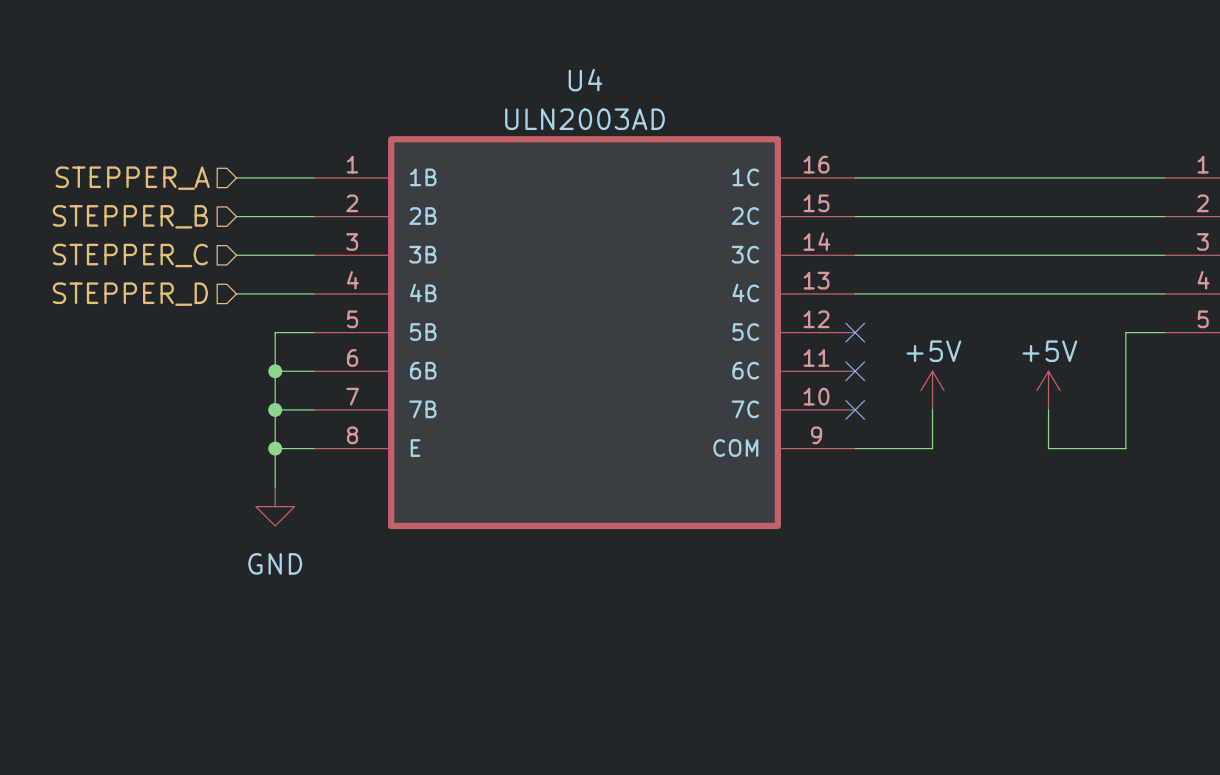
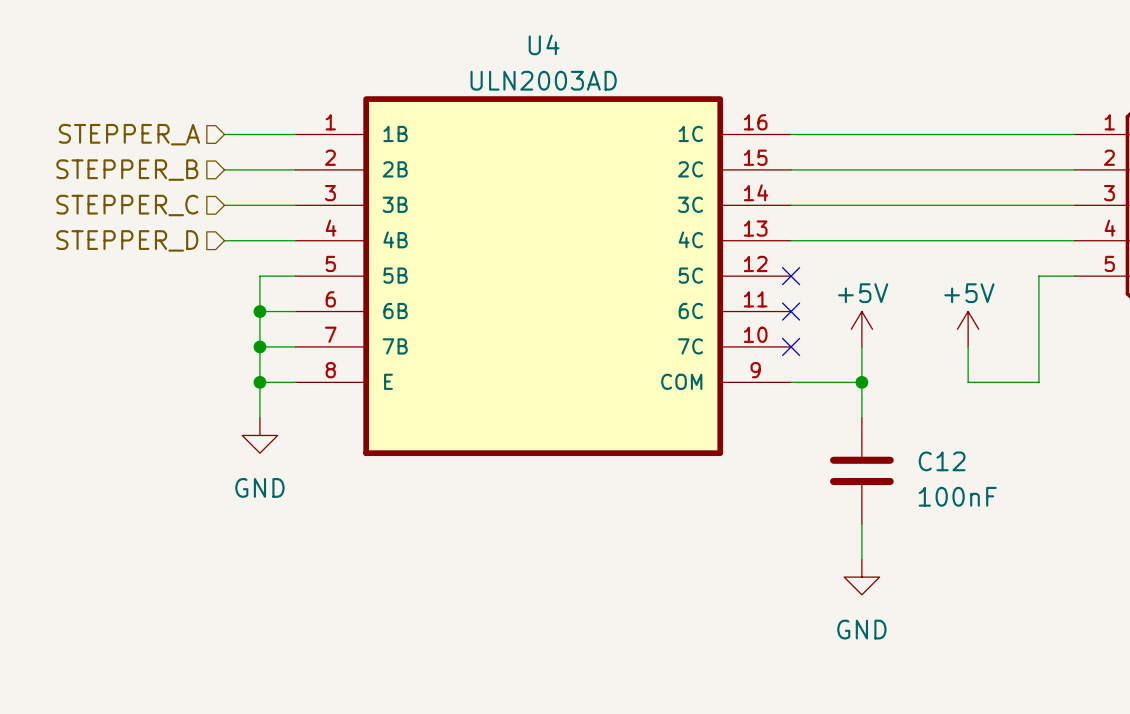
wire: none -> (861, 382) (861, 417)
junction: none -> (861, 382)
C12: none -> 100nF (861, 470)
wire: none -> (861, 523) (861, 559)
power symbol: none -> GND (861, 577)

